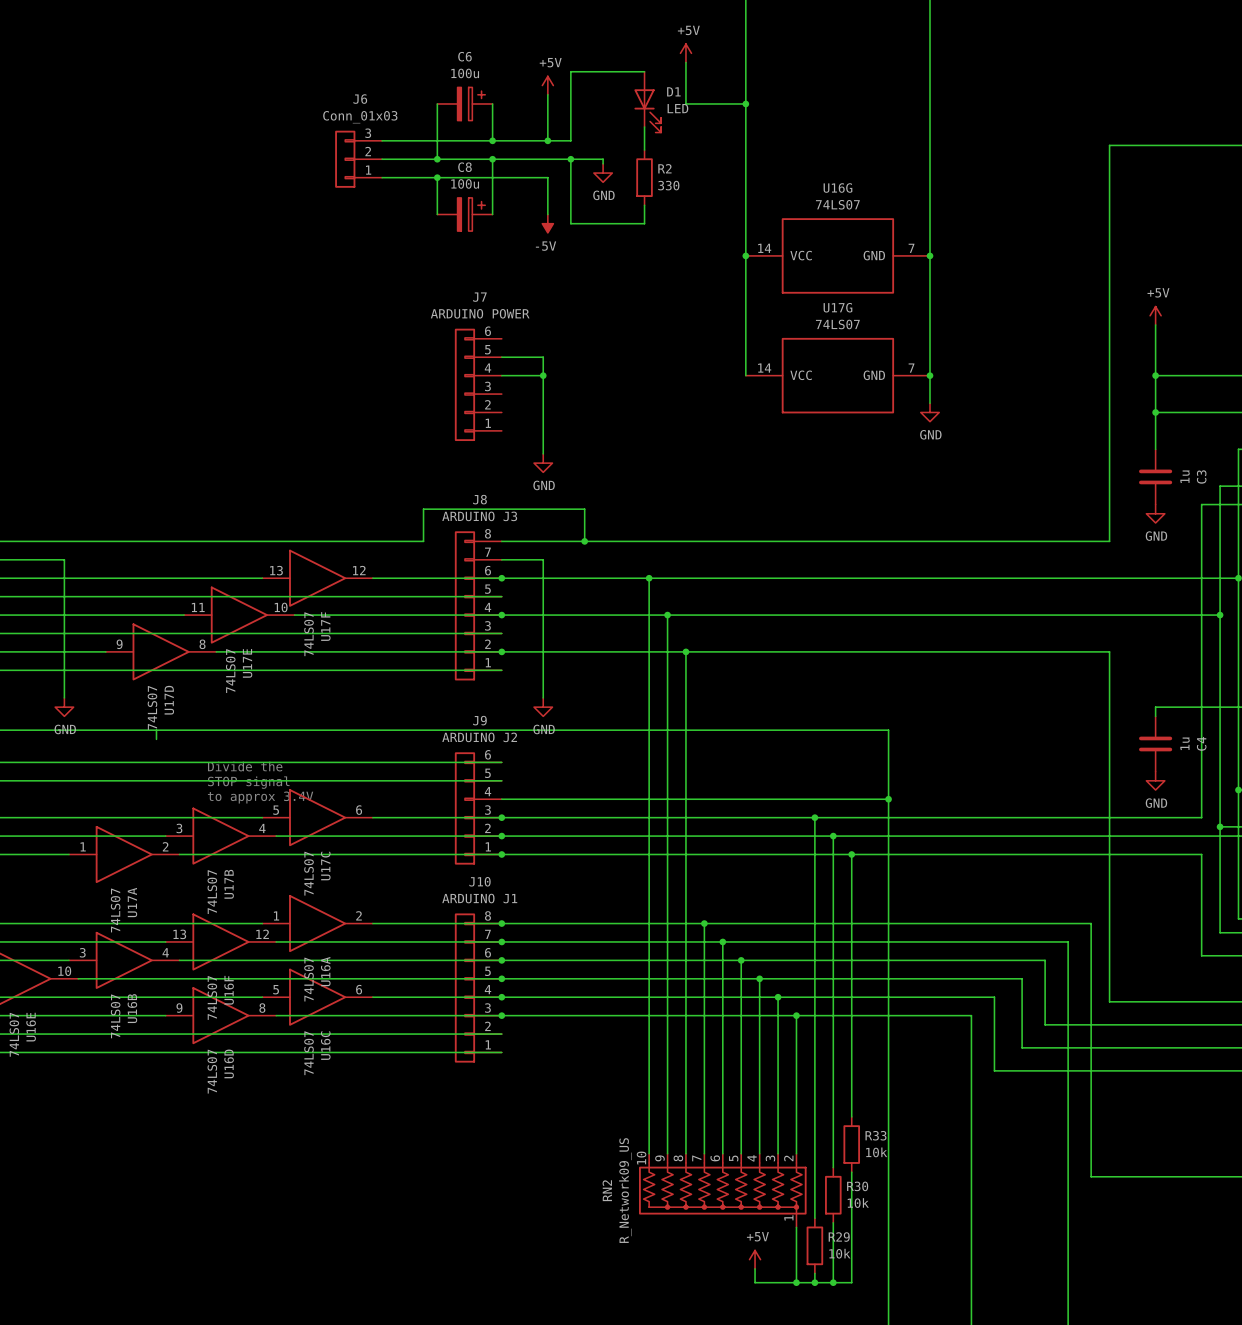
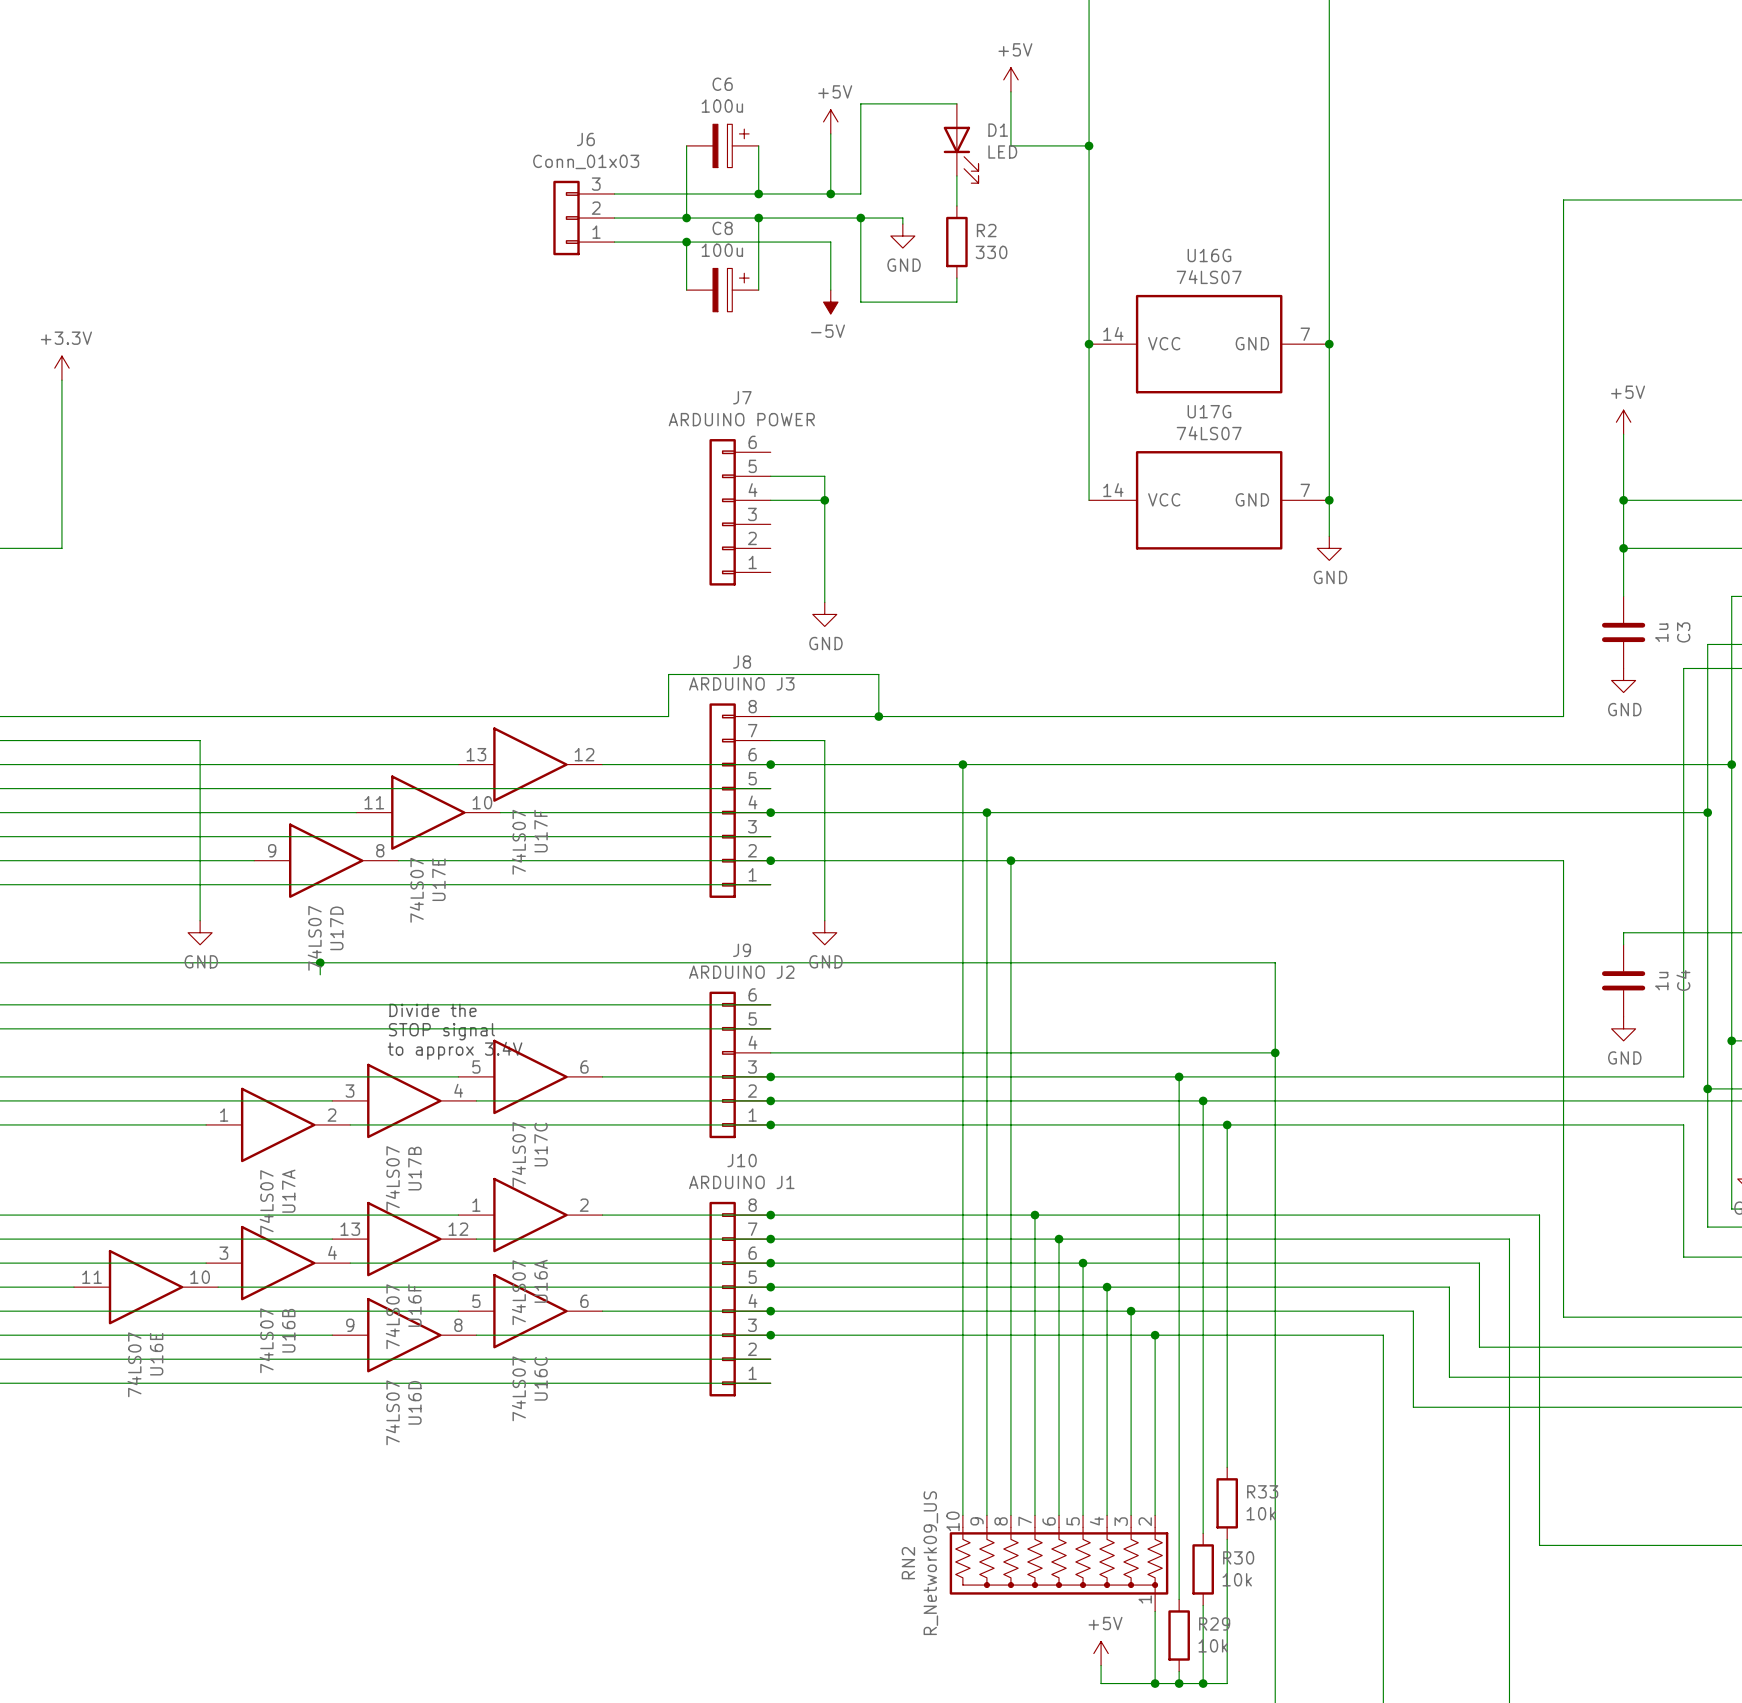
junction: none -> (320, 962)

